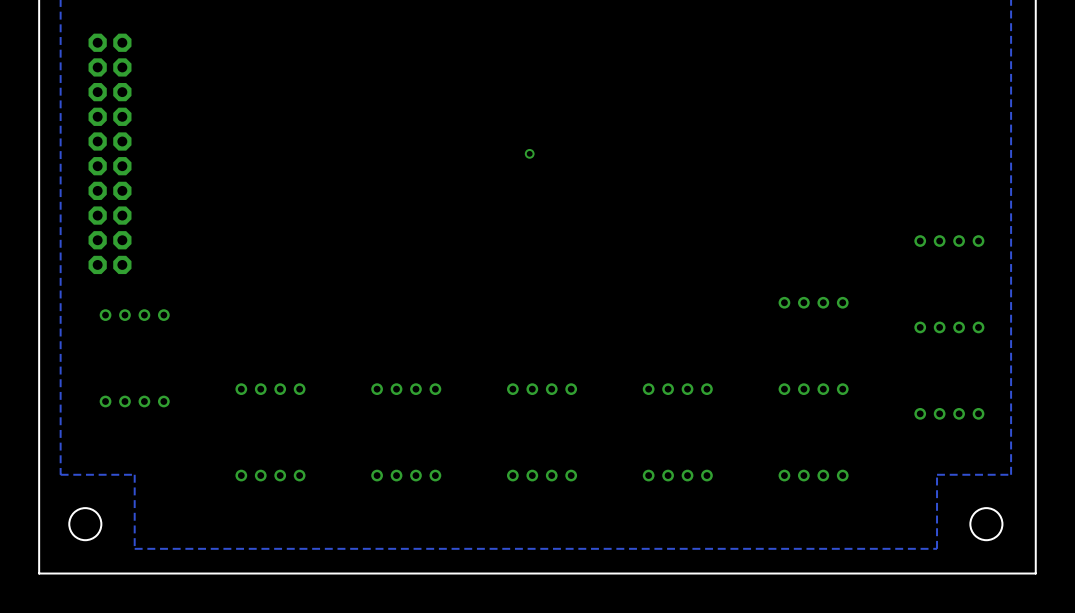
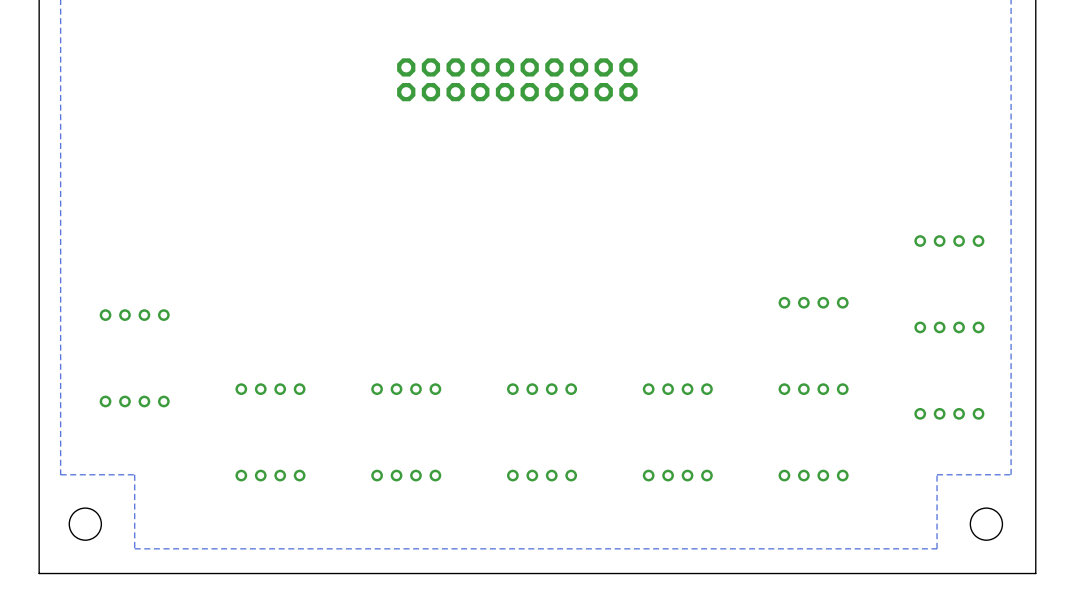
part: none -> (517, 79)
part: (110, 153) -> none
via: (529, 153) -> none

